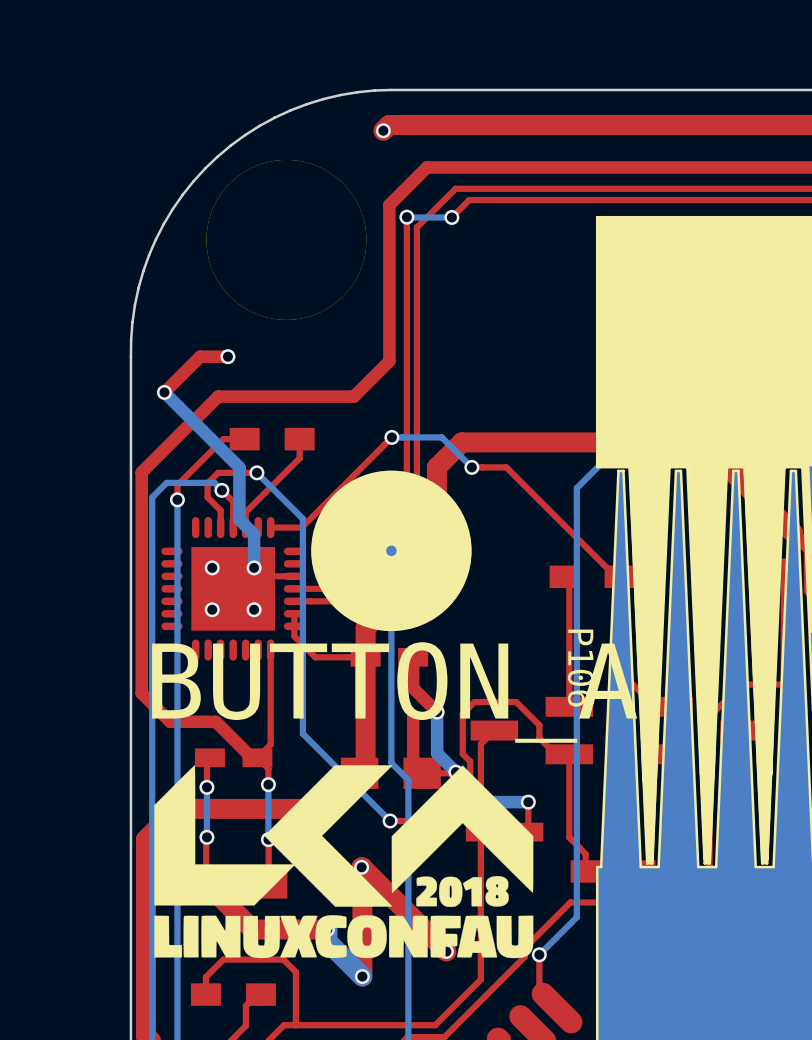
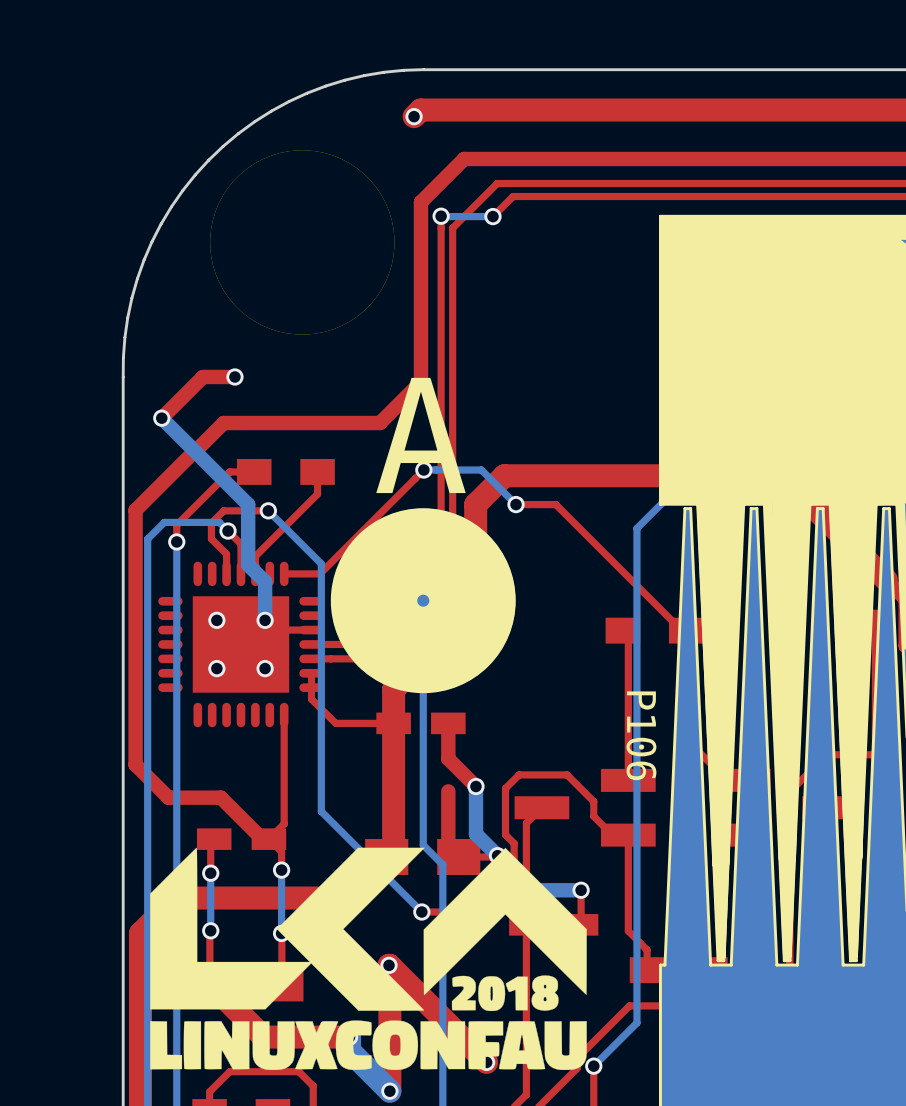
text: none -> A (420, 435)
part value: BUTTON_A (394, 692) -> none

